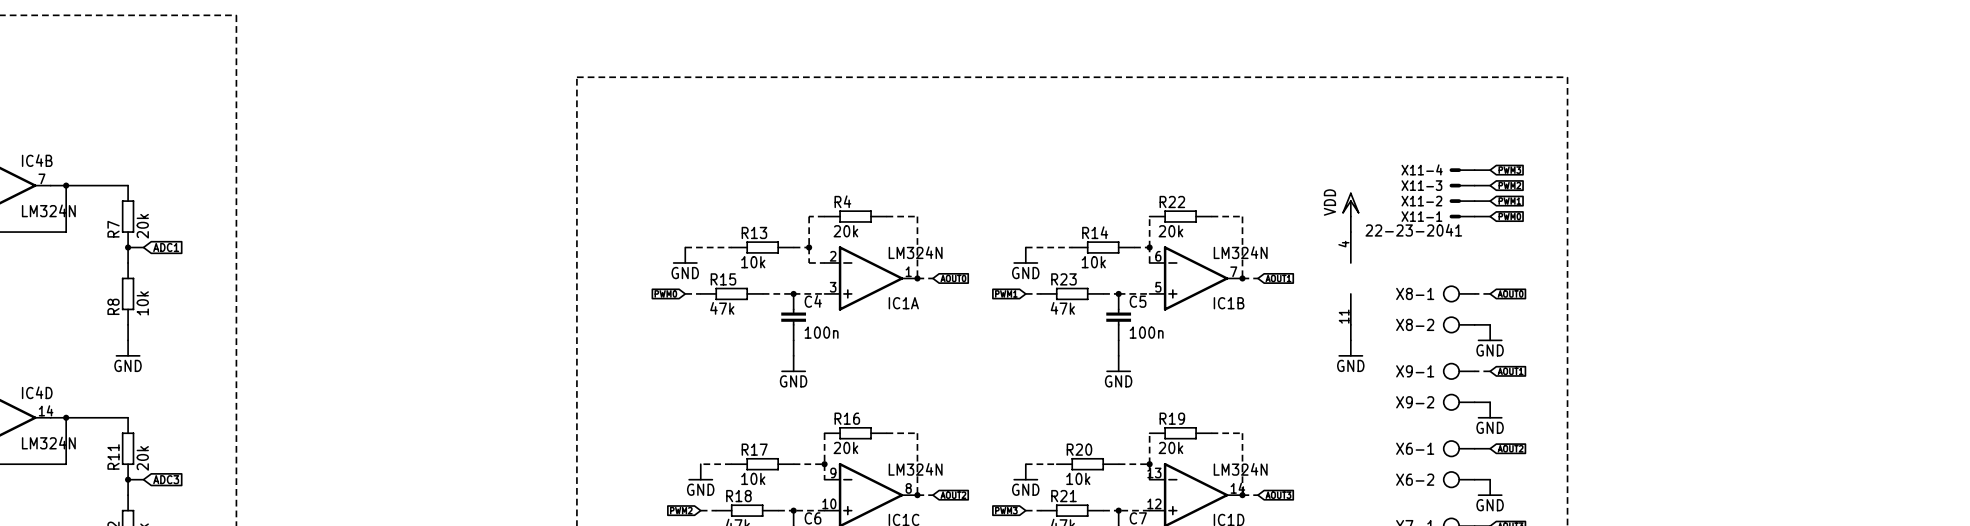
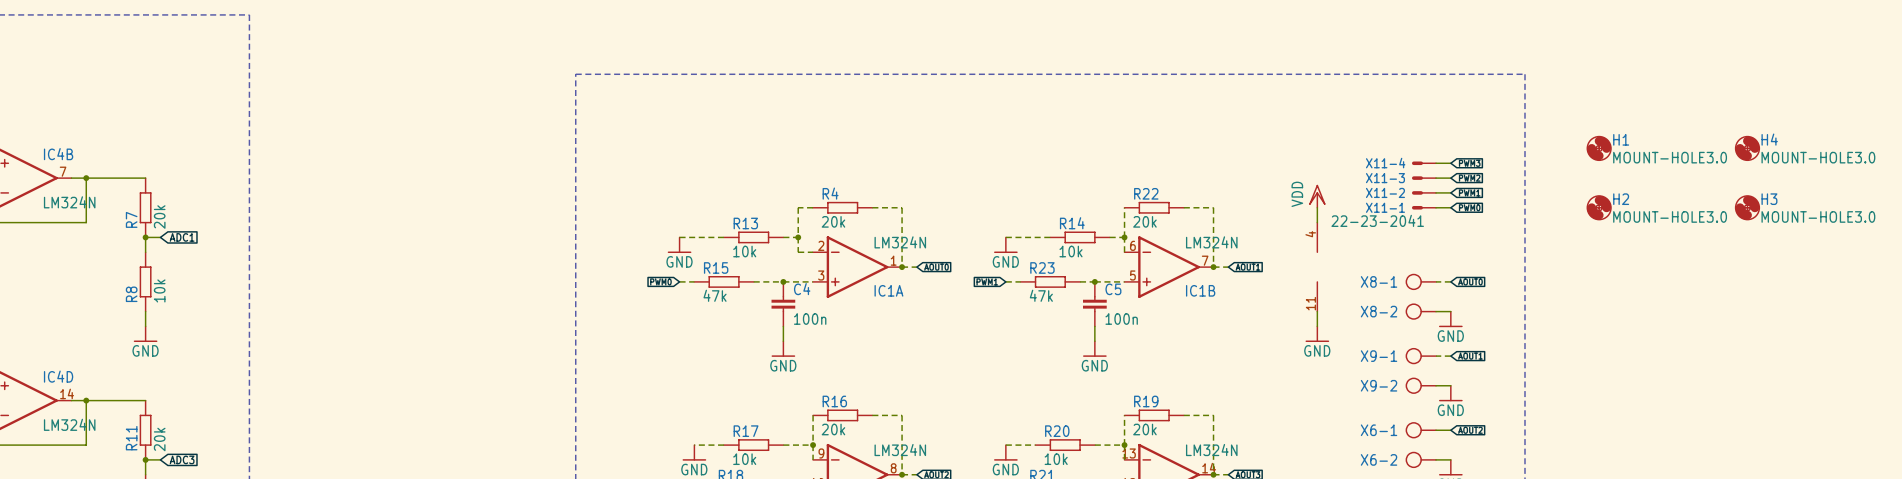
H1: none -> MOUNT-HOLE3.0 (1599, 148)
H4: none -> MOUNT-HOLE3.0 (1747, 148)
H2: none -> MOUNT-HOLE3.0 (1599, 207)
H3: none -> MOUNT-HOLE3.0 (1747, 207)

